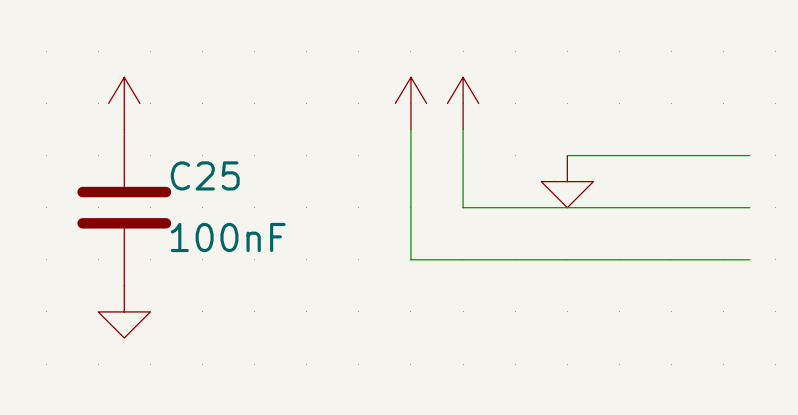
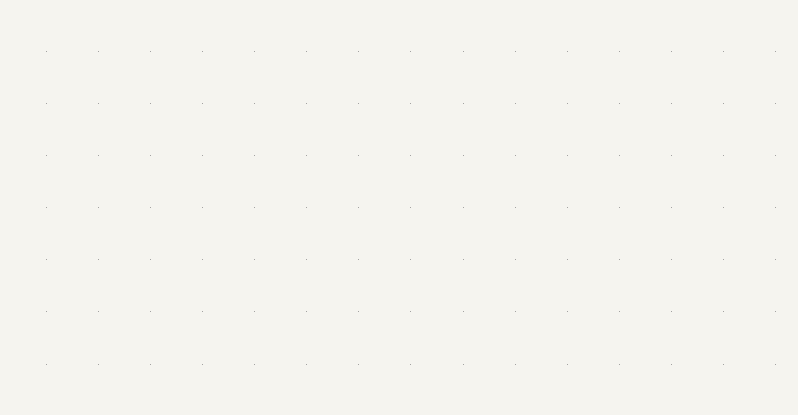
power symbol: (124, 103) -> none
power symbol: (410, 103) -> none
power symbol: (463, 103) -> none
wire: (410, 129) (410, 259) (749, 259) -> none
wire: (463, 129) (463, 207) (749, 207) -> none
wire: (567, 155) (749, 155) -> none
power symbol: (567, 181) -> none
C25: 100nF (124, 207) -> none
power symbol: (124, 311) -> none

